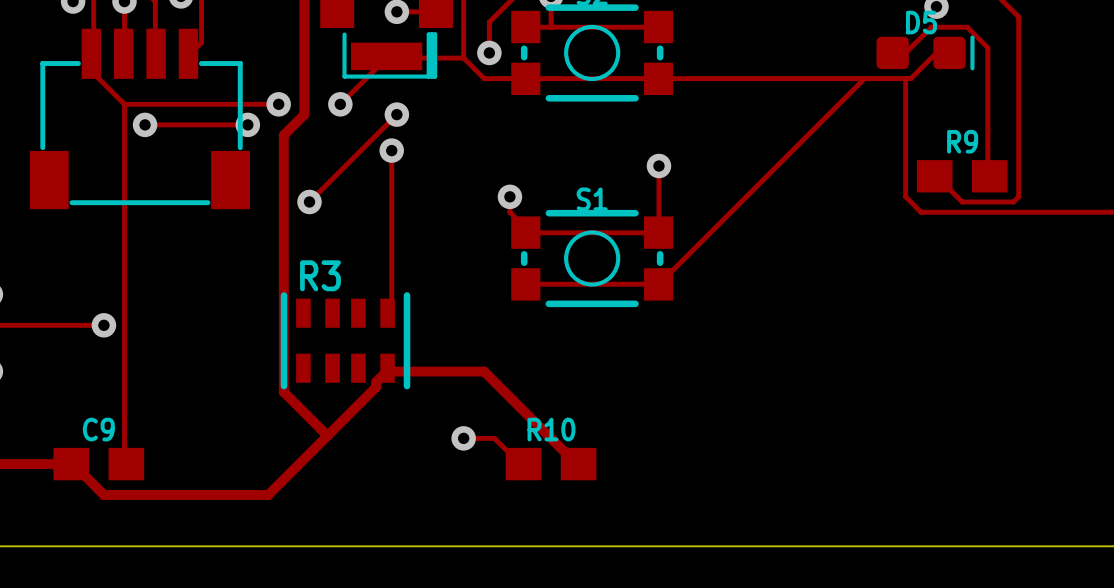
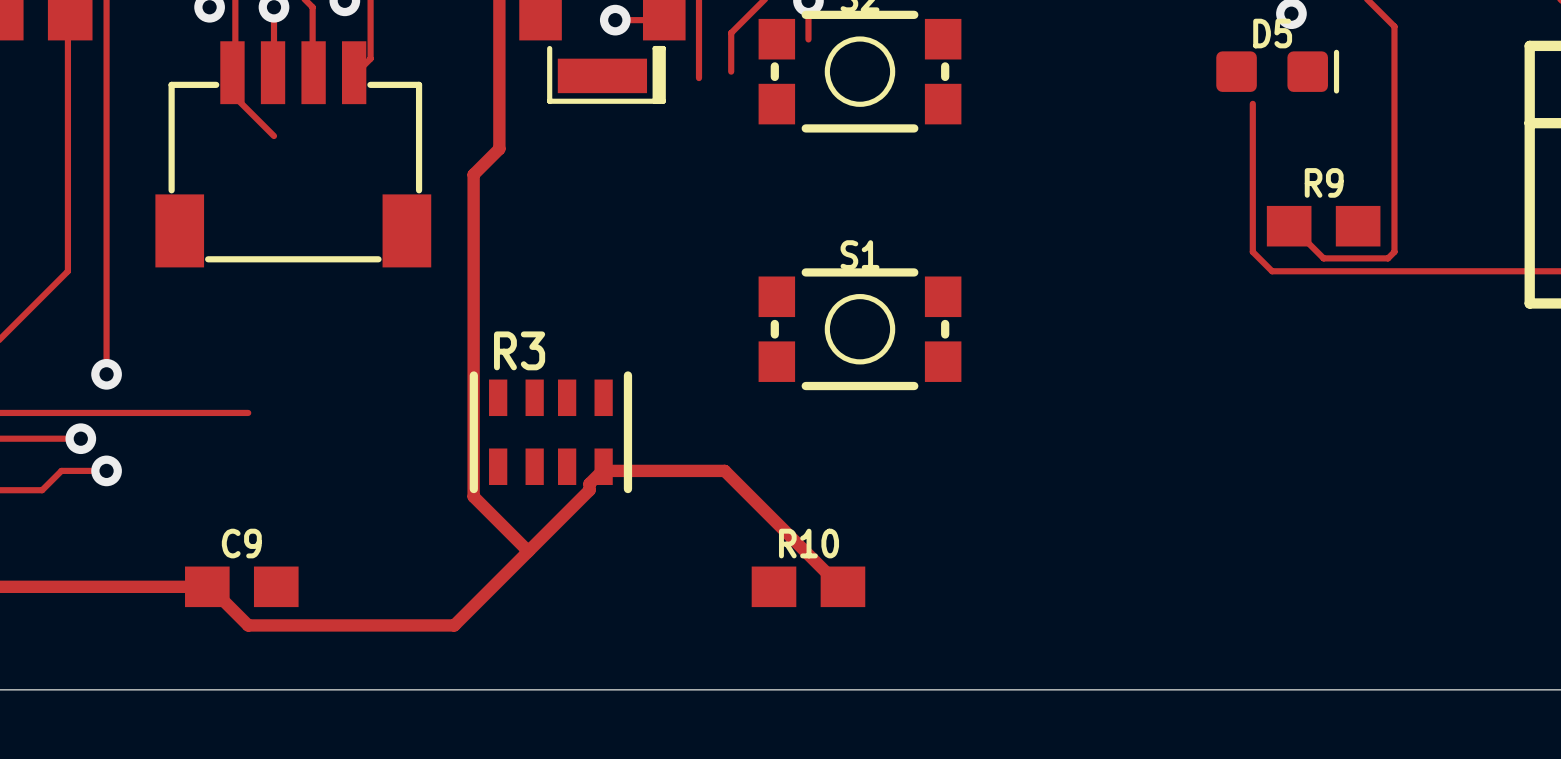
track: (525, 27) (658, 27) -> none
via: (489, 52) -> none
track: (892, 52) (905, 52) (931, 27) (967, 27) (987, 47) (987, 176) (989, 176) -> none
track: (949, 52) (936, 52) (910, 78) (658, 78) -> none
track: (386, 58) (463, 58) (484, 78) (525, 78) -> none
track: (386, 58) (340, 104) -> none
track: (525, 78) (658, 78) -> none
track: (864, 78) (658, 284) -> none
track: (278, 104) (124, 104) (124, 464) (126, 464) -> none
via: (278, 104) -> none
via: (340, 104) -> none
track: (396, 114) (309, 201) -> none
via: (396, 114) -> none
track: (145, 124) (247, 124) -> none
via: (145, 124) -> none
via: (247, 124) -> none
track: (391, 150) (391, 309) (387, 313) -> none
via: (391, 150) -> none
track: (658, 166) (658, 232) (525, 232) (525, 227) (509, 212) (509, 196) -> none
via: (658, 166) -> none
via: (509, 196) -> none
via: (309, 201) -> none
track: (525, 284) (658, 284) -> none
via: (103, 325) -> none
track: (463, 438) (494, 438) (520, 464) (523, 464) -> none
via: (463, 438) -> none

